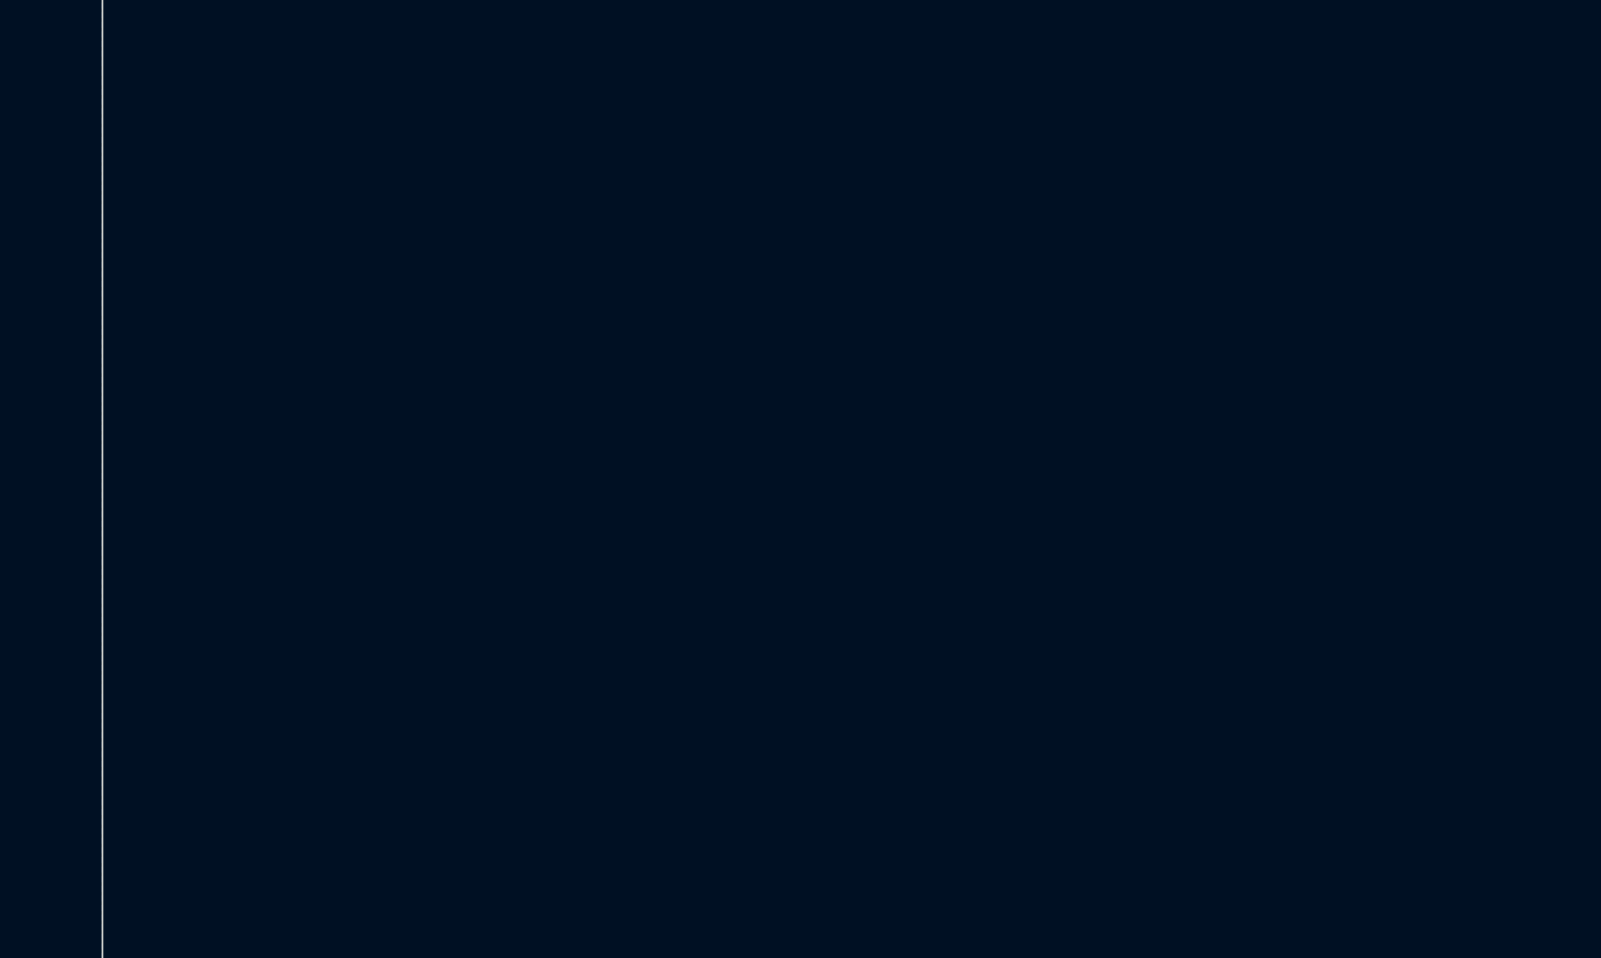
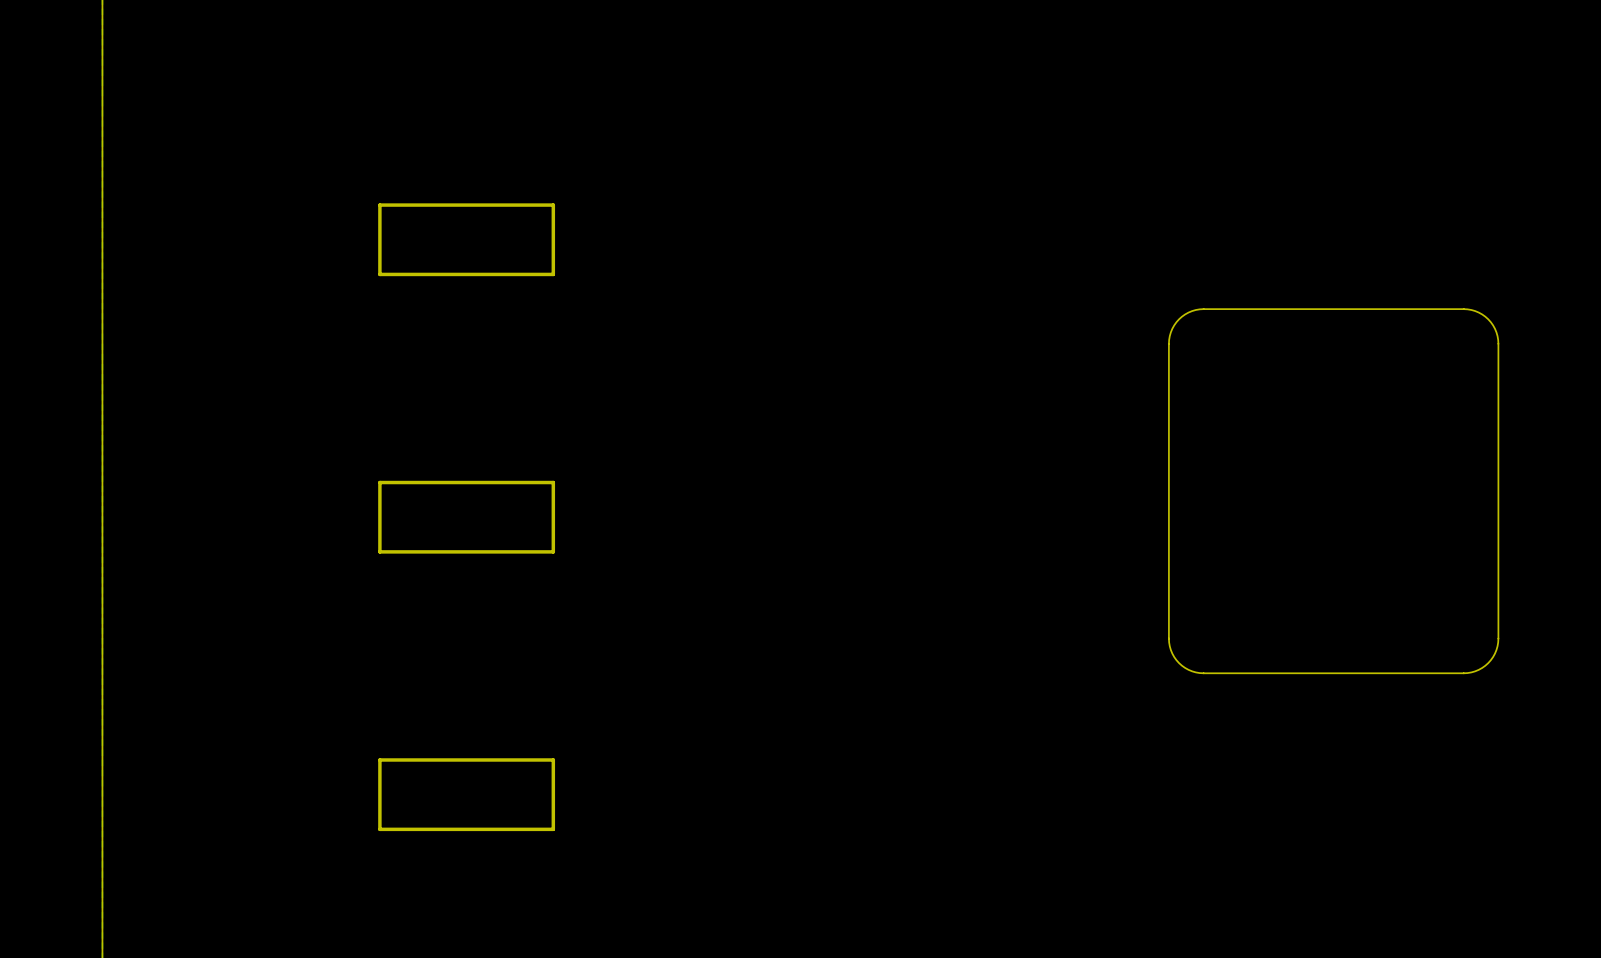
board edge: none -> (553, 205) (379, 205) (379, 274) (553, 274) (553, 205)
board edge: none -> (1463, 309) (1203, 309) (1188, 312) (1176, 322) (1170, 332) (1168, 343) (1168, 638) (1172, 653) (1181, 665) (1192, 671) (1203, 673) (1463, 673) (1478, 669) (1490, 660) (1496, 650) (1498, 638) (1498, 339) (1494, 328) (1488, 319) (1478, 312) (1463, 309)
board edge: none -> (553, 482) (553, 551) (379, 551) (379, 482) (553, 482)
board edge: none -> (553, 759) (553, 829) (379, 829) (379, 759) (553, 759)

